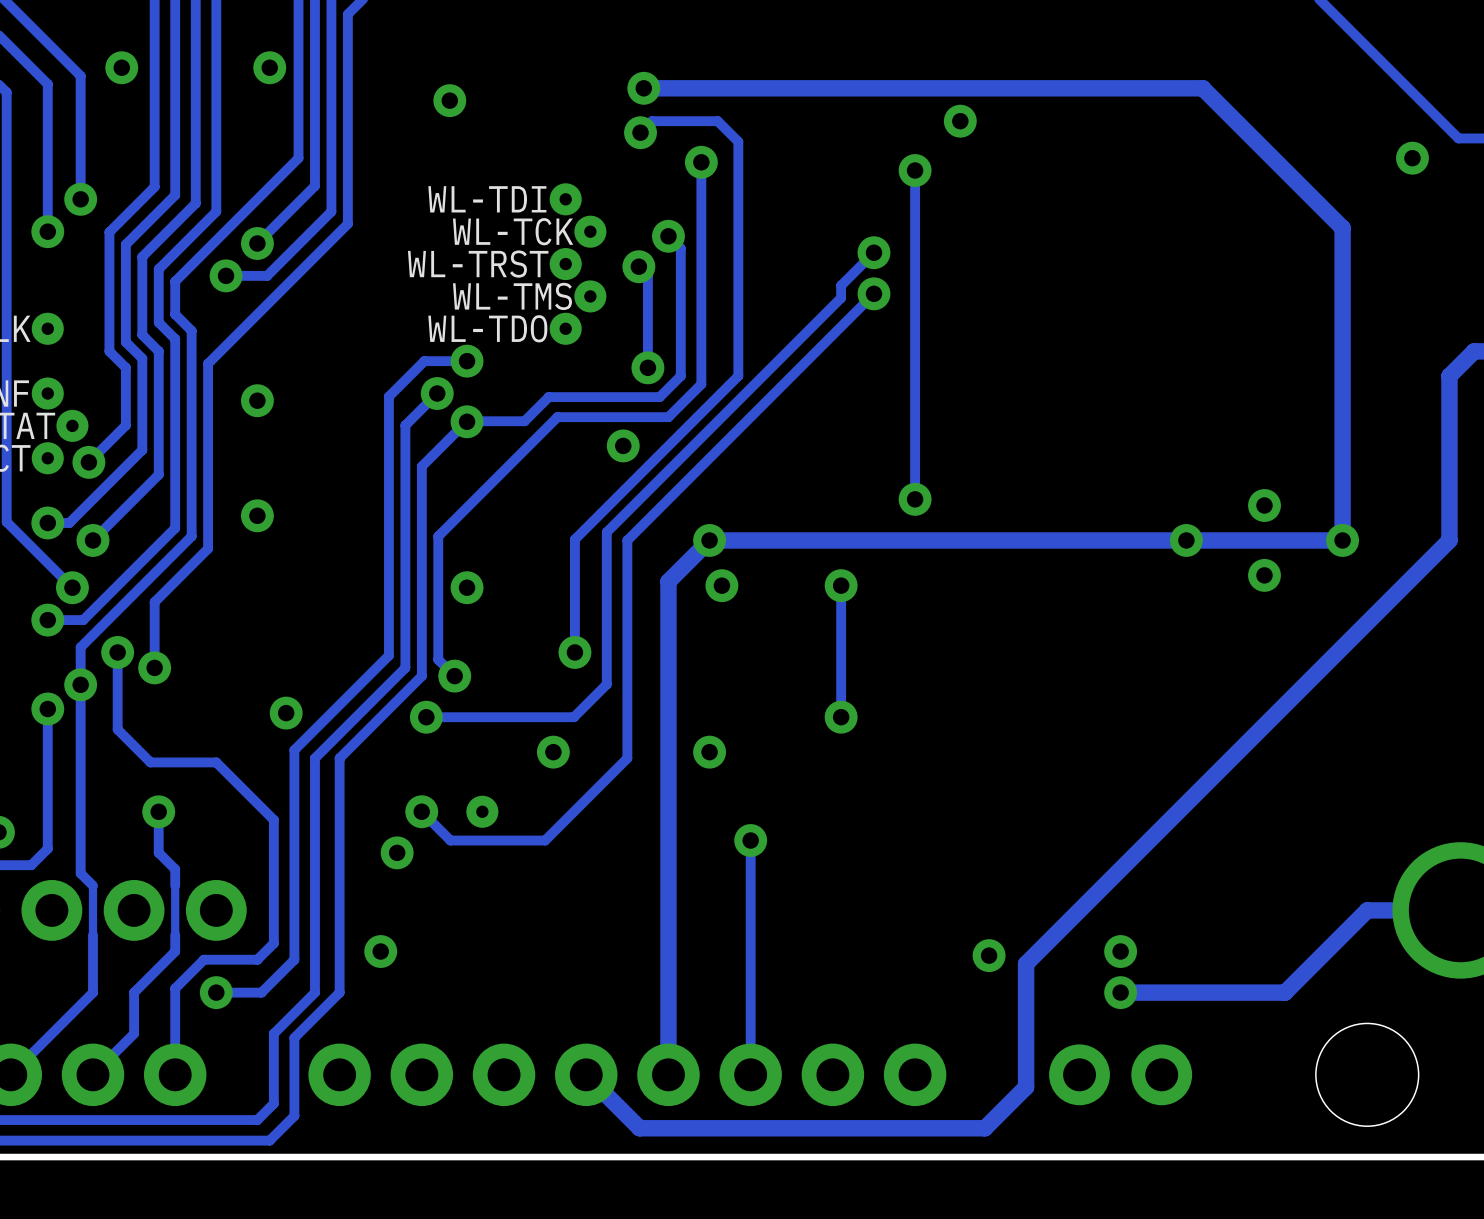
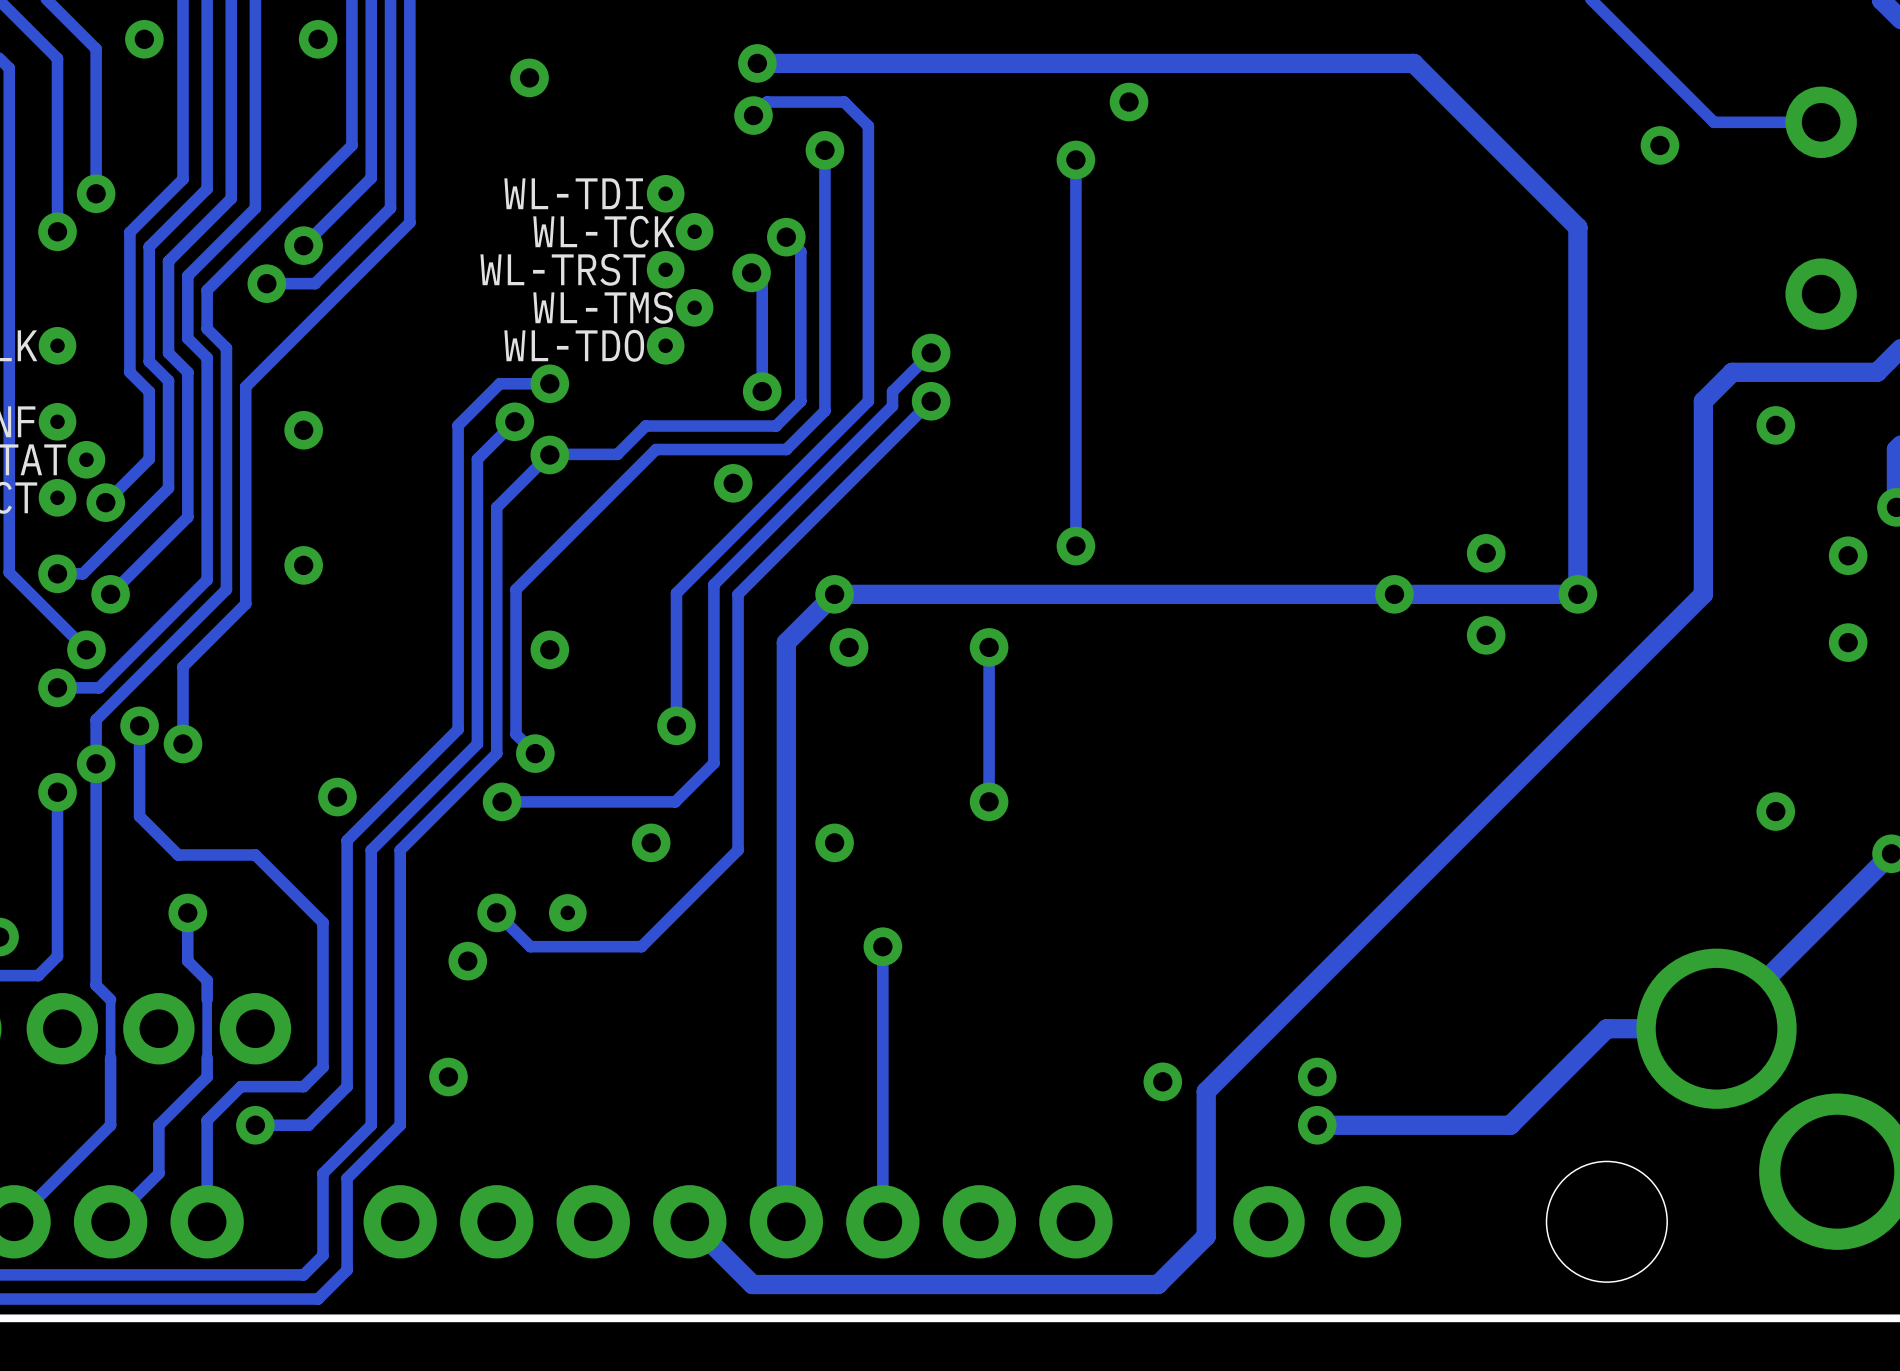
track: (873, 252) (841, 285) (841, 297) (758, 380) -> (931, 353) (892, 391) (892, 406)
via: (873, 252) -> none
track: (873, 293) (791, 376) -> none
via: (873, 293) -> none
via: none -> (931, 353)
via: none -> (931, 401)

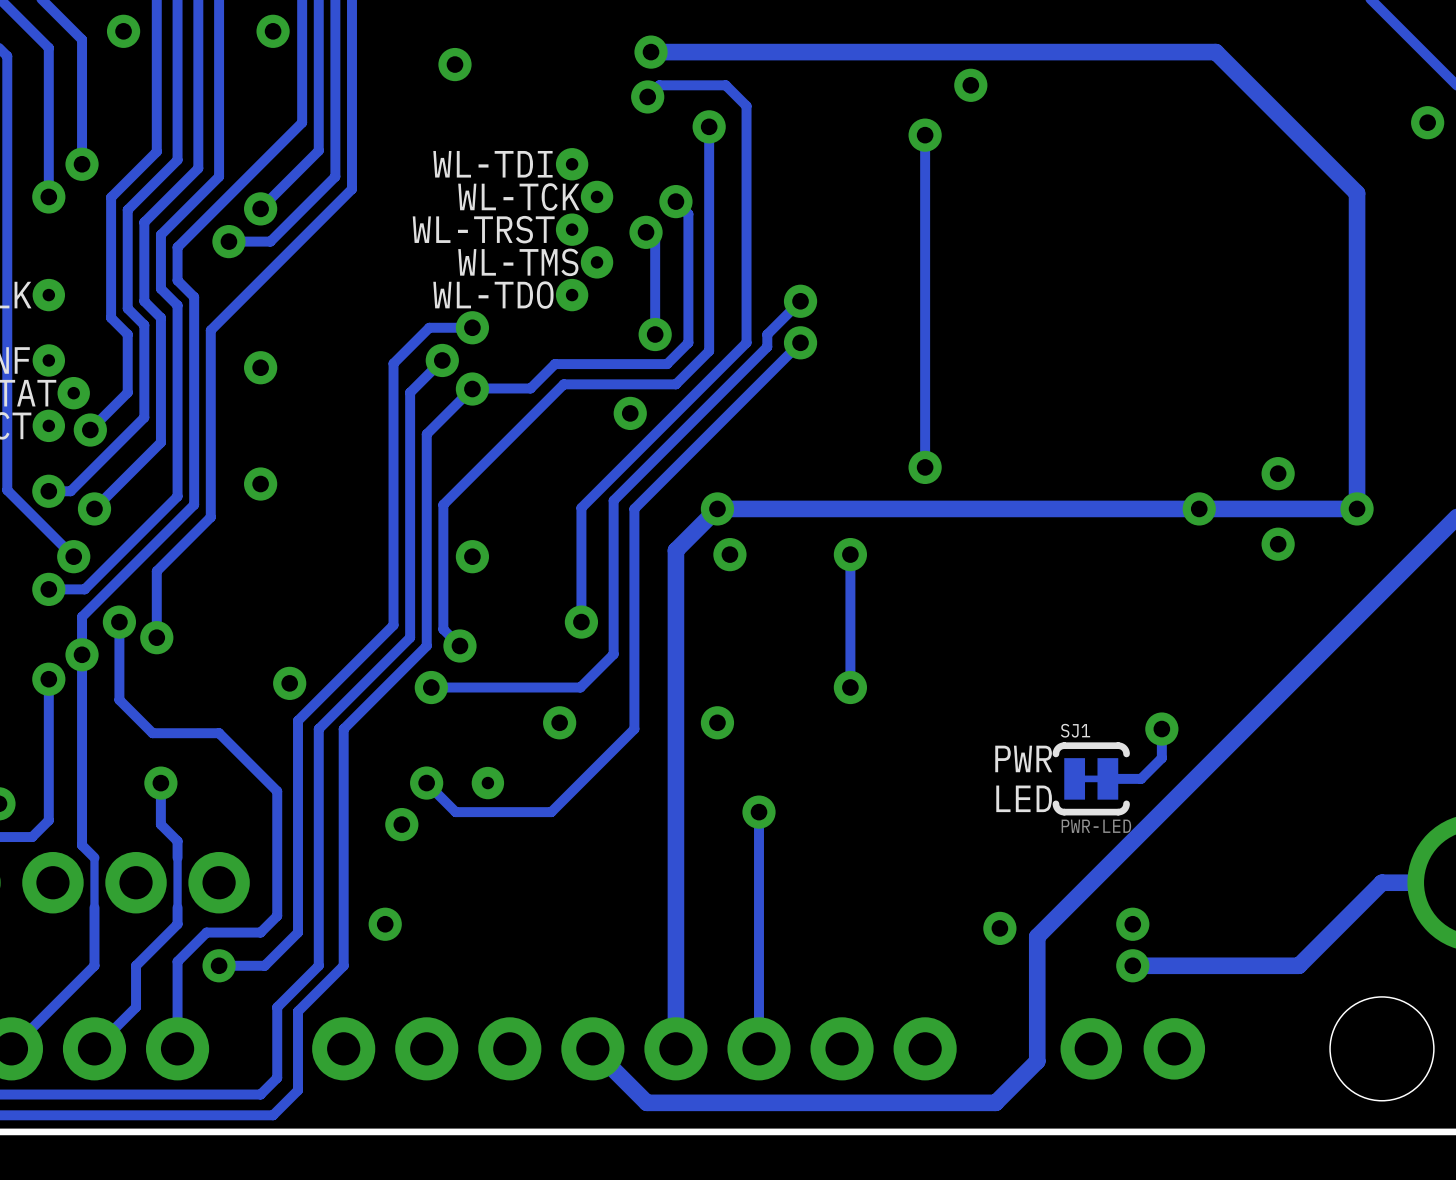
track: none -> (1161, 729) (1161, 758) (1141, 778) (1107, 778)
via: none -> (1161, 729)
text: none -> PWR (1023, 758)
SJ1: none -> PWR-LED (1091, 778)
text: none -> LED (1024, 798)

